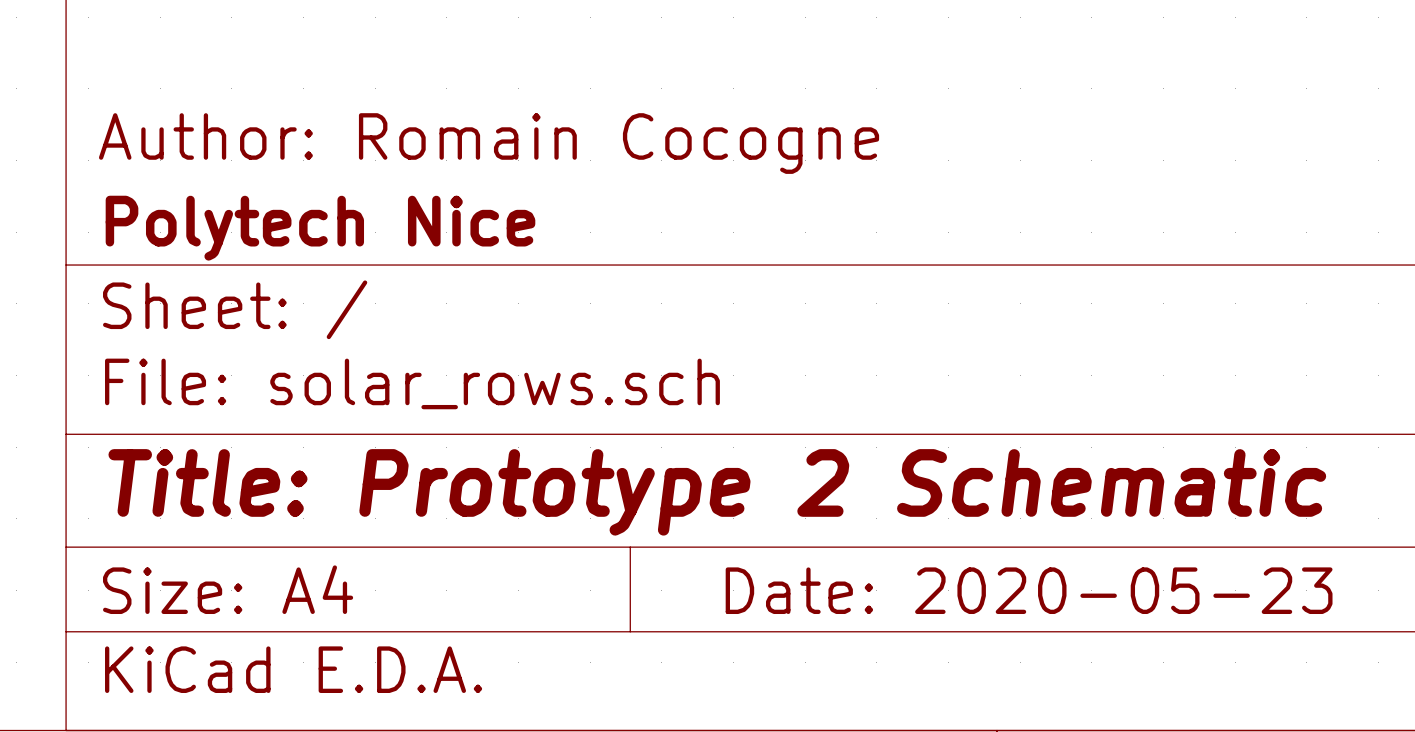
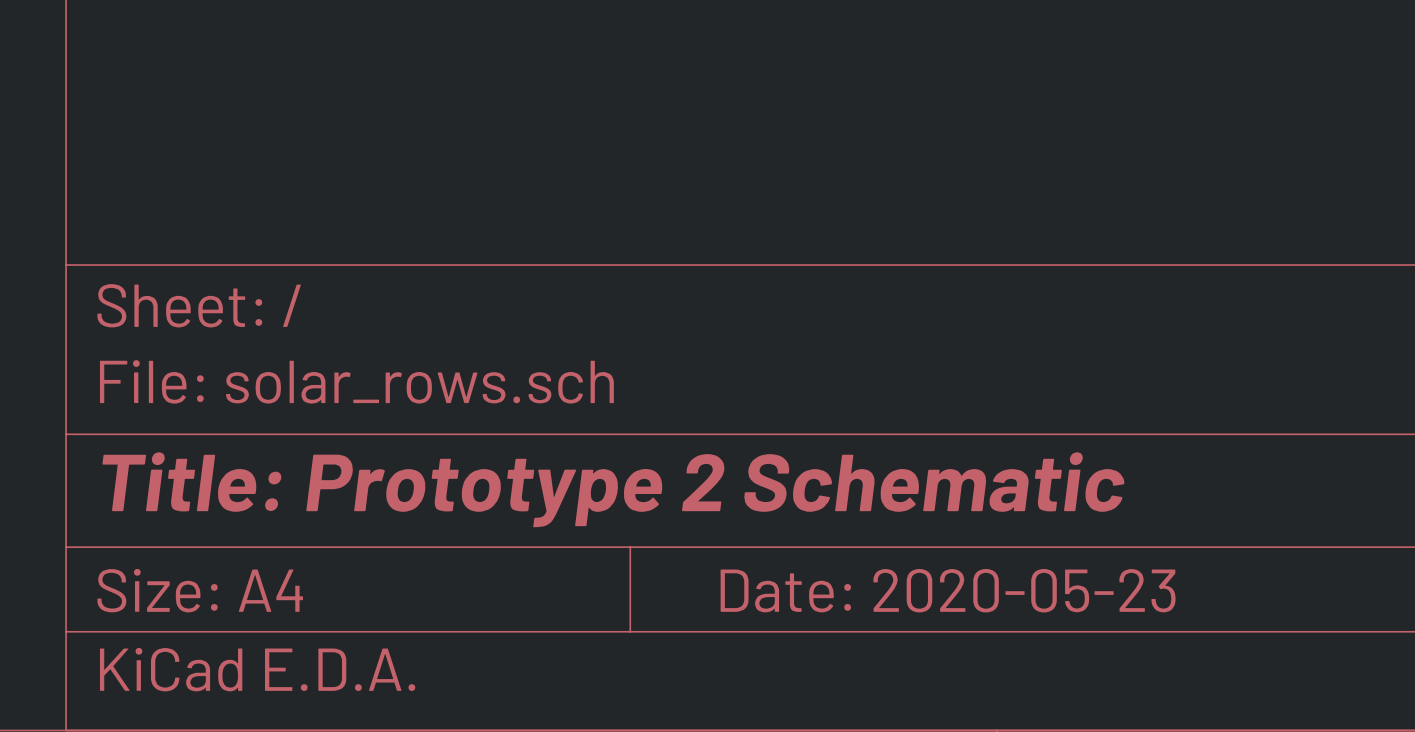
title block: Author: Romain Cocogne (489, 143) -> none
title block: Polytech Nice (320, 228) -> none

